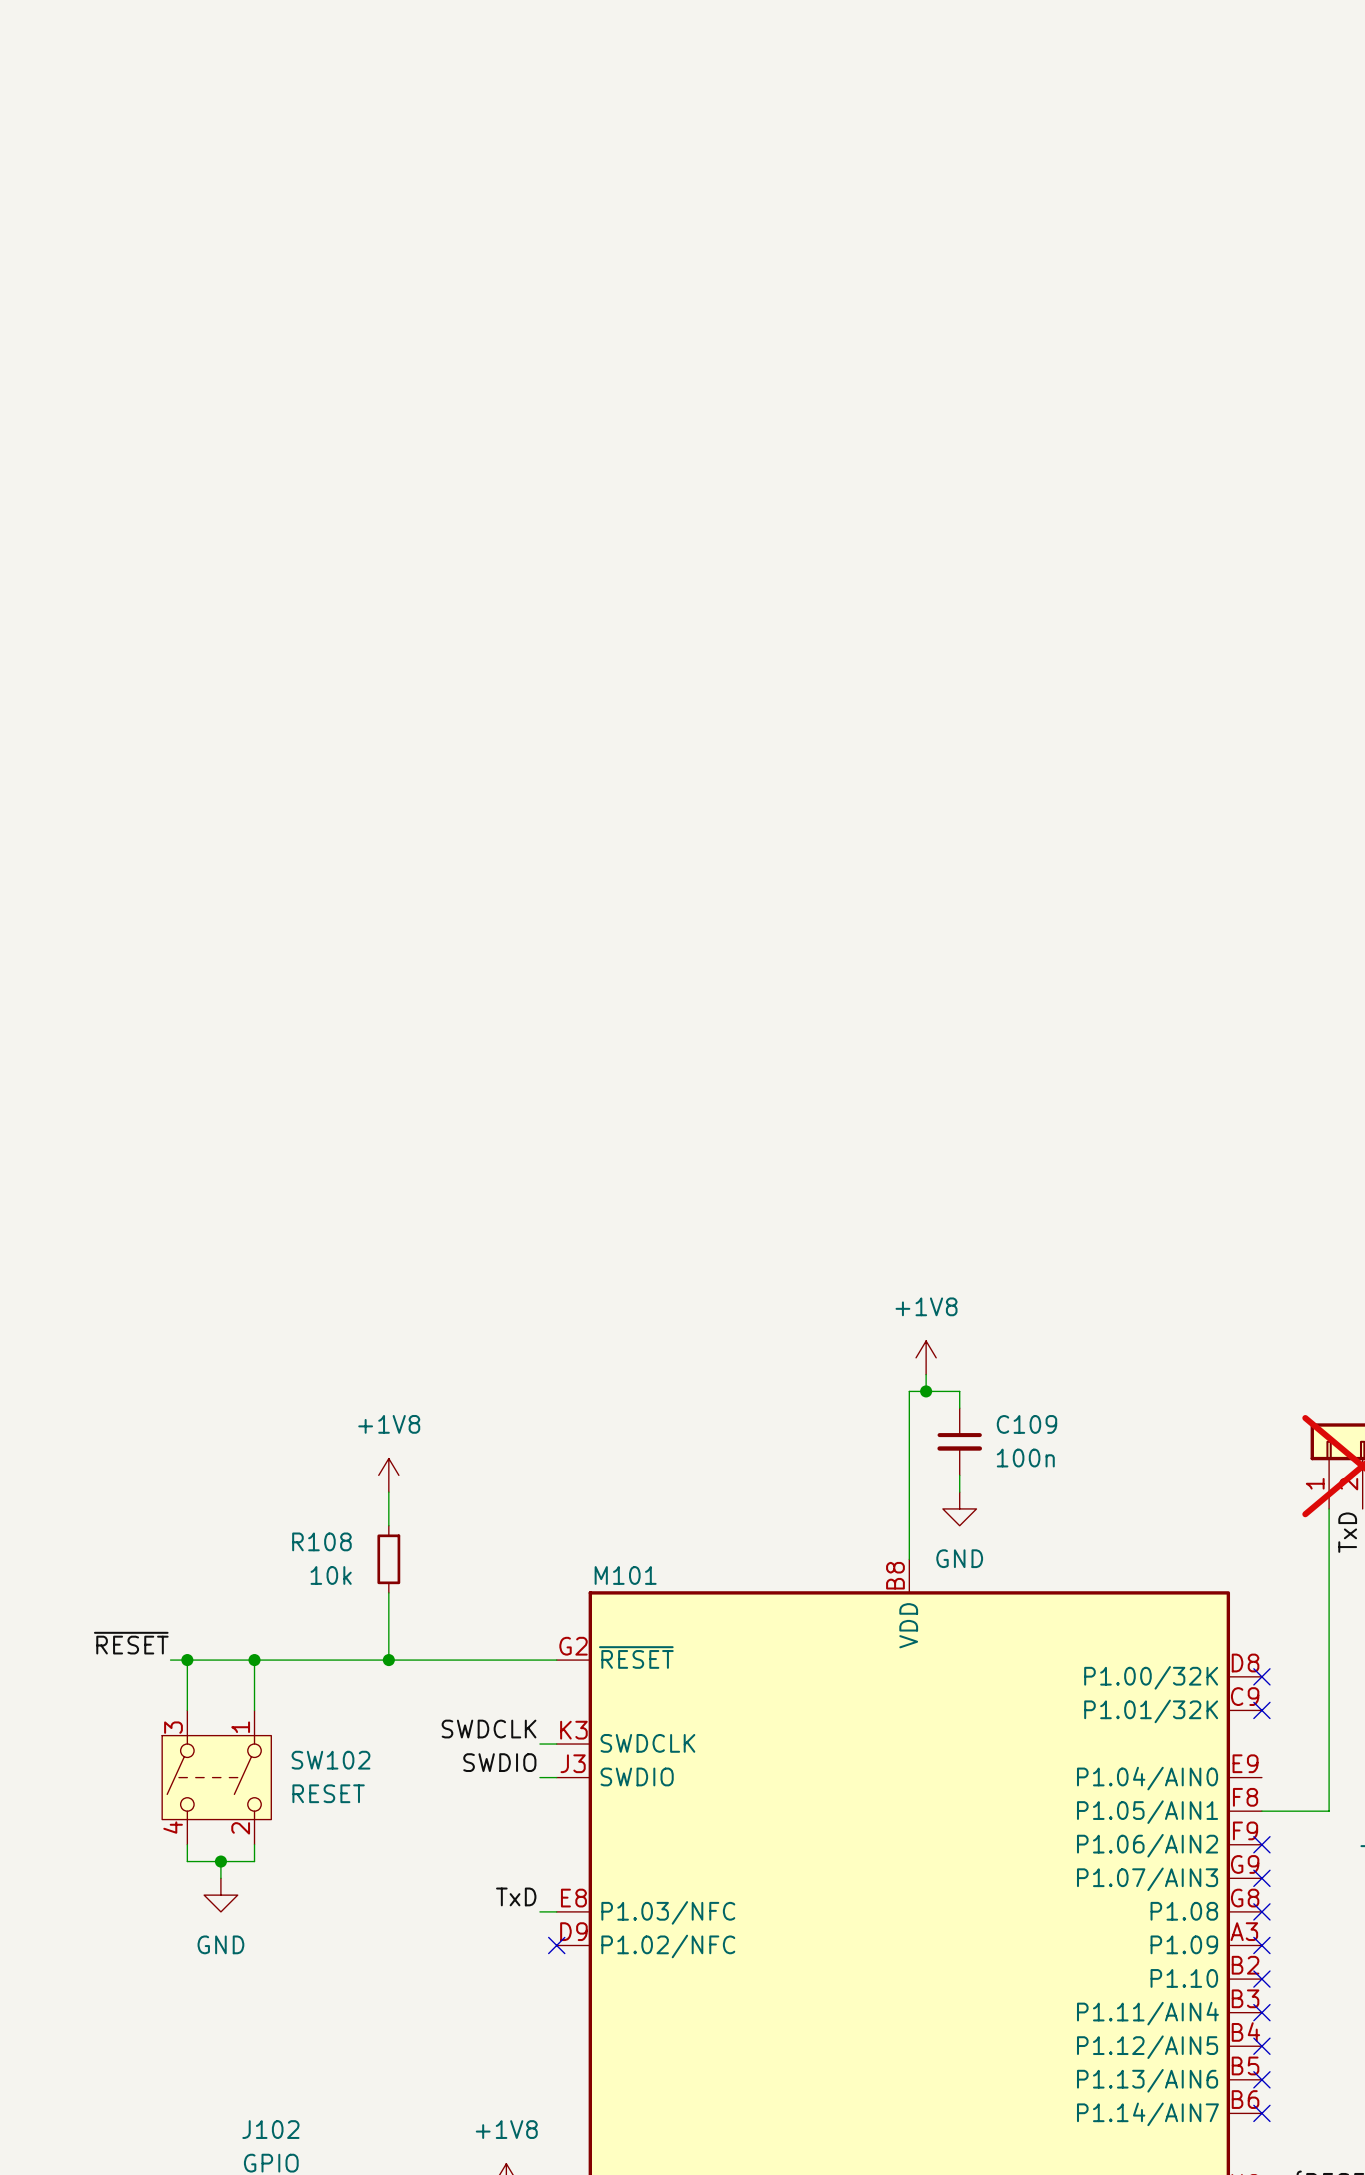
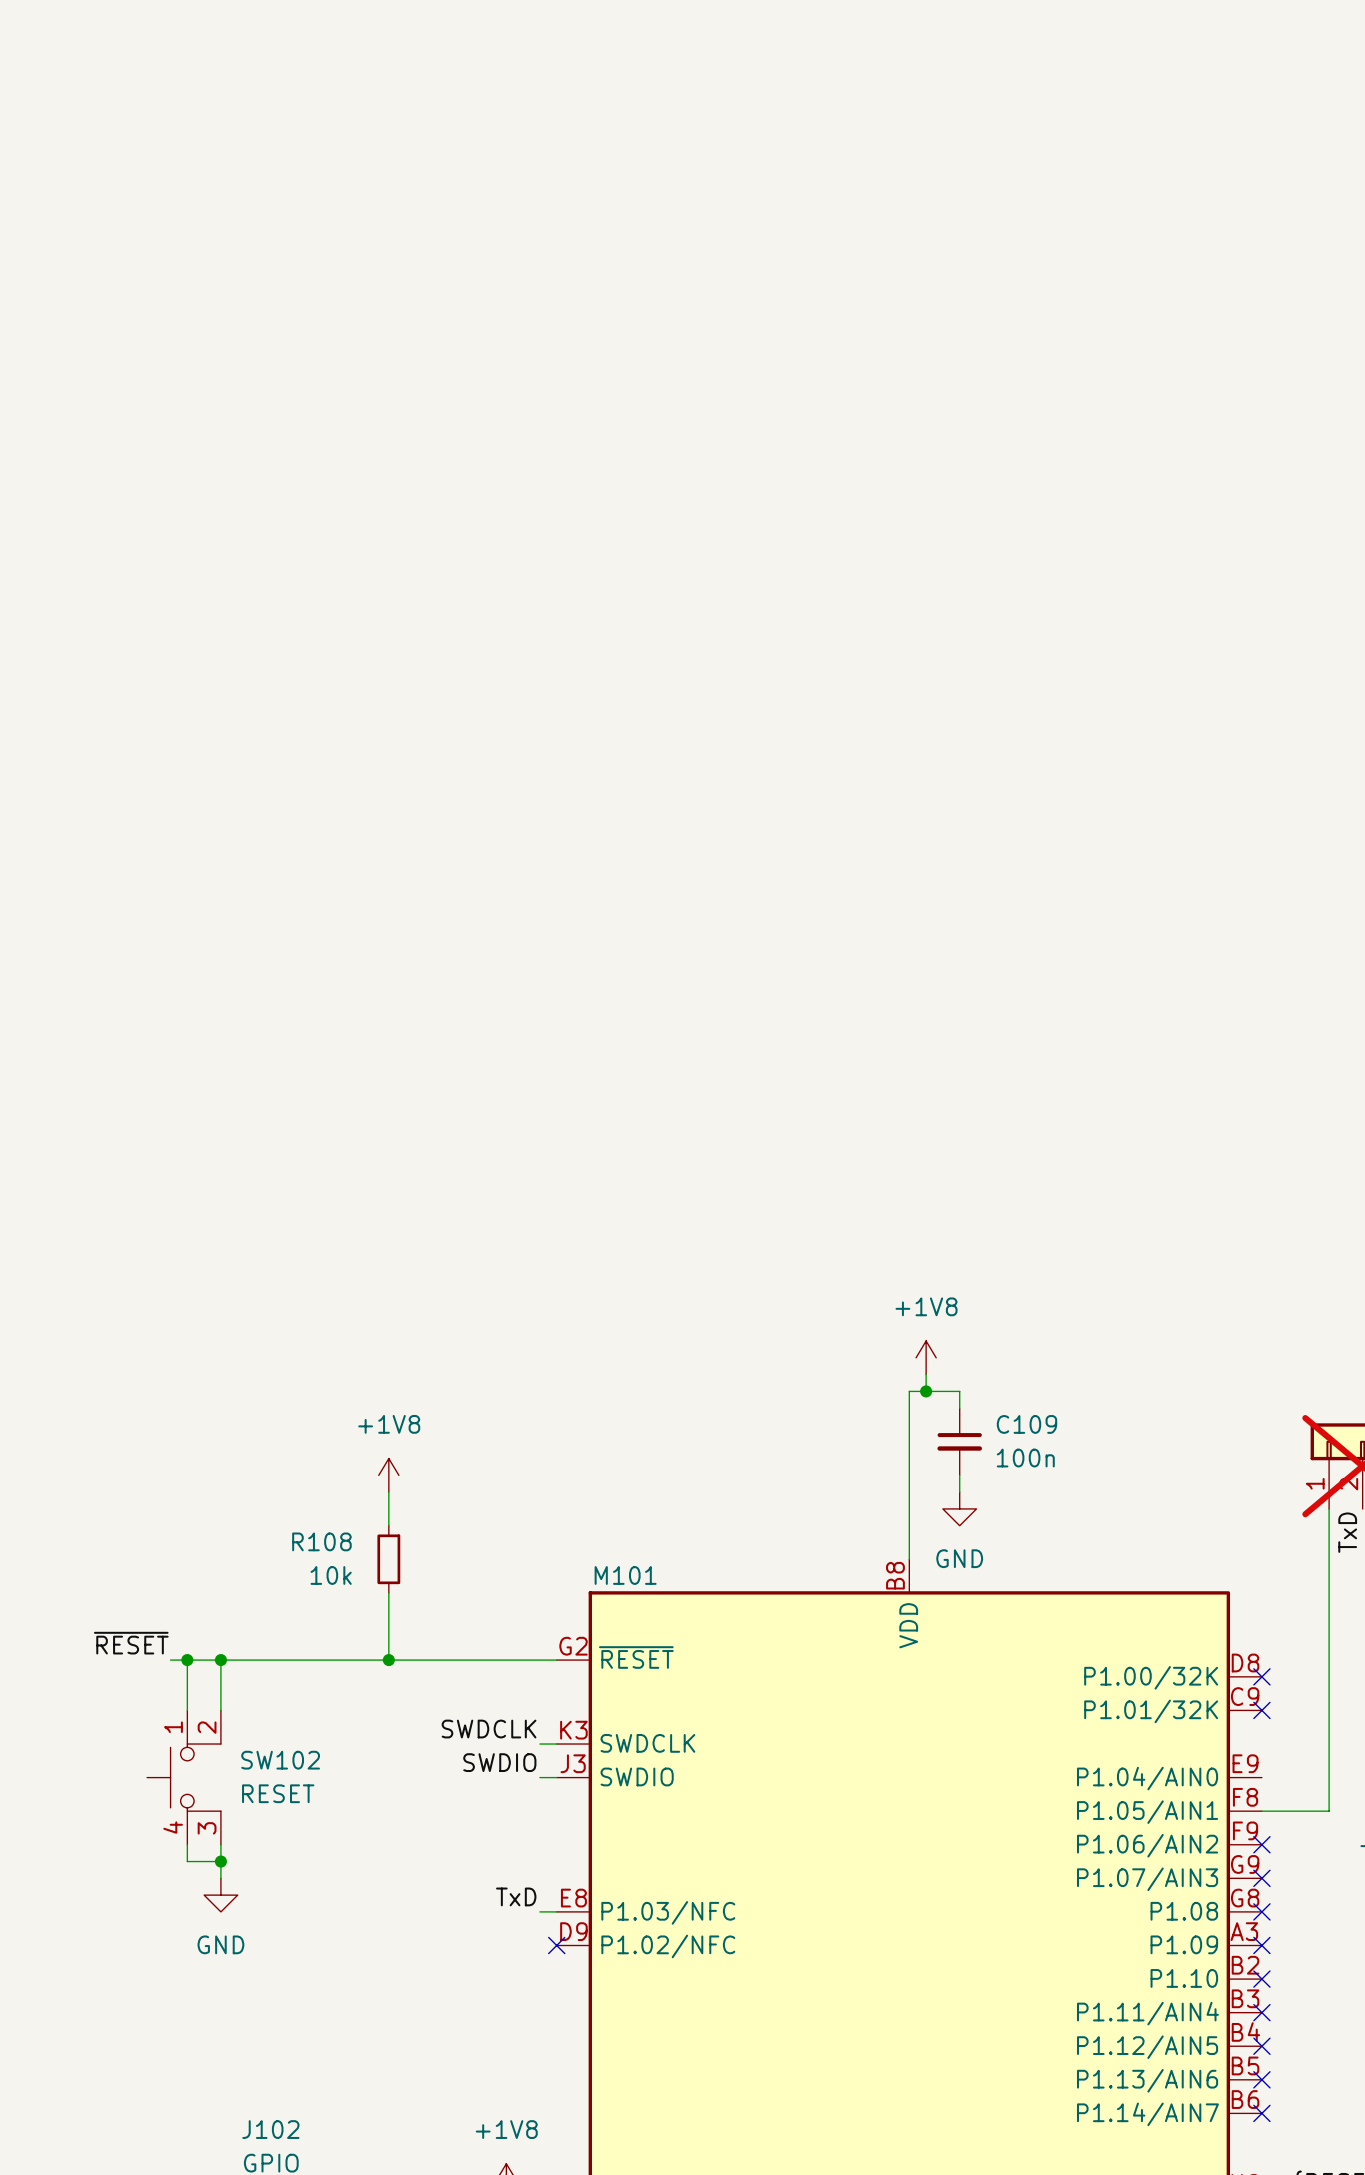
wire: (254, 1660) (254, 1710) -> (220, 1660) (220, 1710)
junction position: (254, 1660) -> (220, 1660)
SW102 symbol: [162, 1710, 272, 1845] -> [147, 1710, 221, 1845]
wire: (254, 1844) (254, 1861) (220, 1861) -> (220, 1844) (220, 1861)

